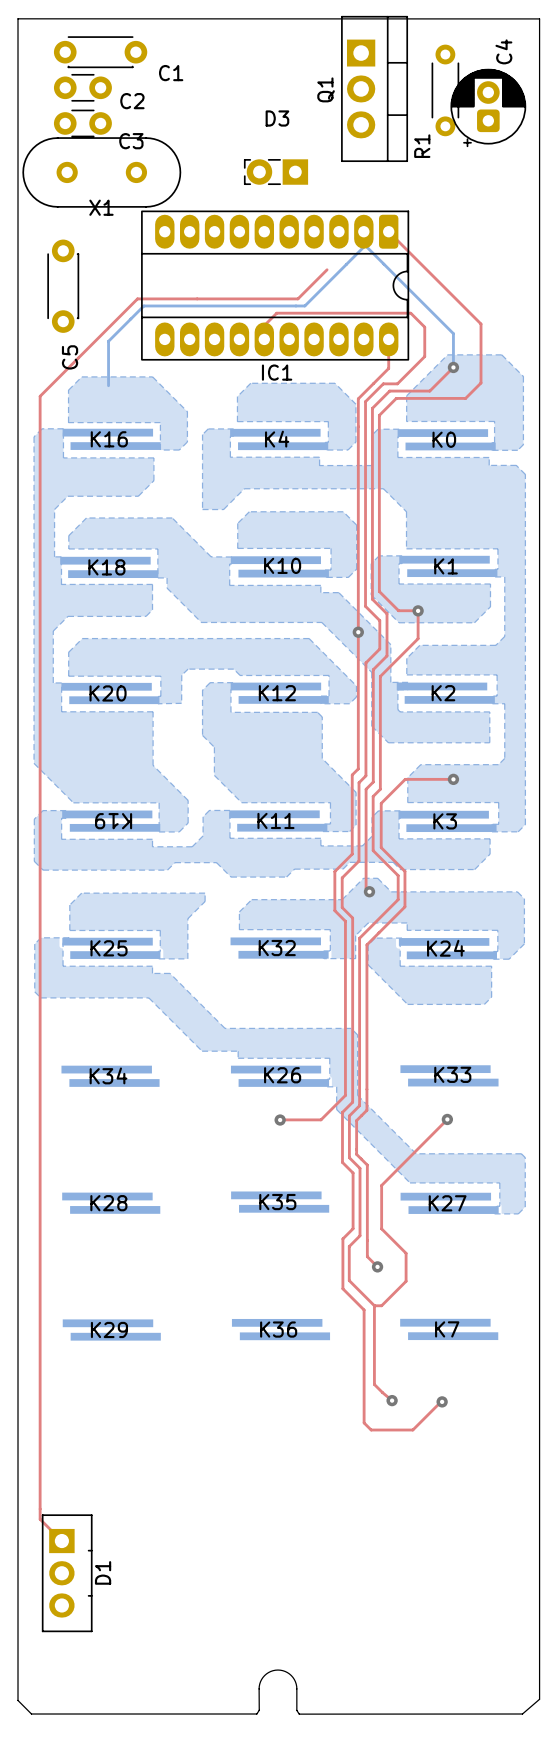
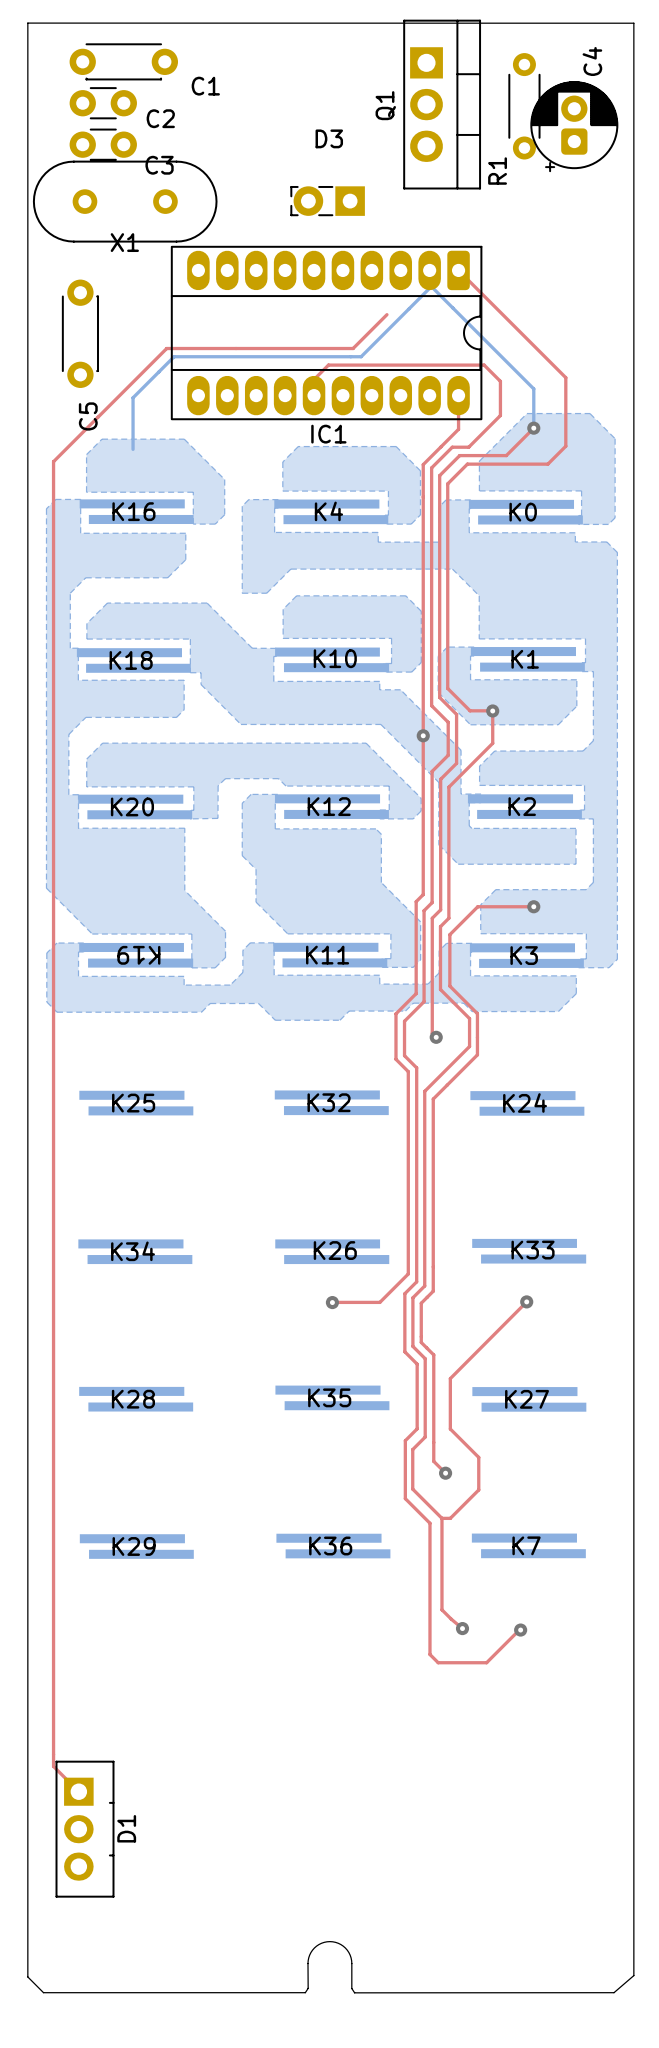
bottom zone outline: (81, 893) (205, 893) (205, 901) (187, 918) (187, 958) (158, 958) (160, 930) (69, 930) (69, 905) (81, 893) -> none
bottom zone outline: (40, 937) (69, 937) (63, 943) (63, 966) (152, 966) (152, 973) (170, 973) (225, 1028) (351, 1028) (357, 1034) (357, 1095) (416, 1153) (521, 1153) (525, 1157) (525, 1206) (518, 1213) (494, 1213) (494, 1208) (499, 1206) (499, 1182) (410, 1182) (336, 1109) (336, 1086) (327, 1086) (327, 1079) (329, 1079) (329, 1058) (238, 1058) (238, 1051) (202, 1051) (148, 997) (40, 997) (34, 991) (34, 944) (40, 937) -> none
bottom zone outline: (375, 938) (401, 938) (400, 942) (400, 966) (491, 966) (491, 997) (484, 1004) (407, 1004) (368, 964) (368, 945) (375, 938) -> none
bottom zone outline: (493, 951) (497, 951) (497, 930) (407, 930) (407, 922) (368, 922) (355, 935) (355, 958) (323, 958) (322, 951) (330, 950) (330, 929) (239, 929) (239, 911) (251, 899) (342, 899) (363, 878) (377, 878) (391, 891) (517, 891) (524, 898) (524, 943) (509, 959) (493, 959) (493, 951) -> none

